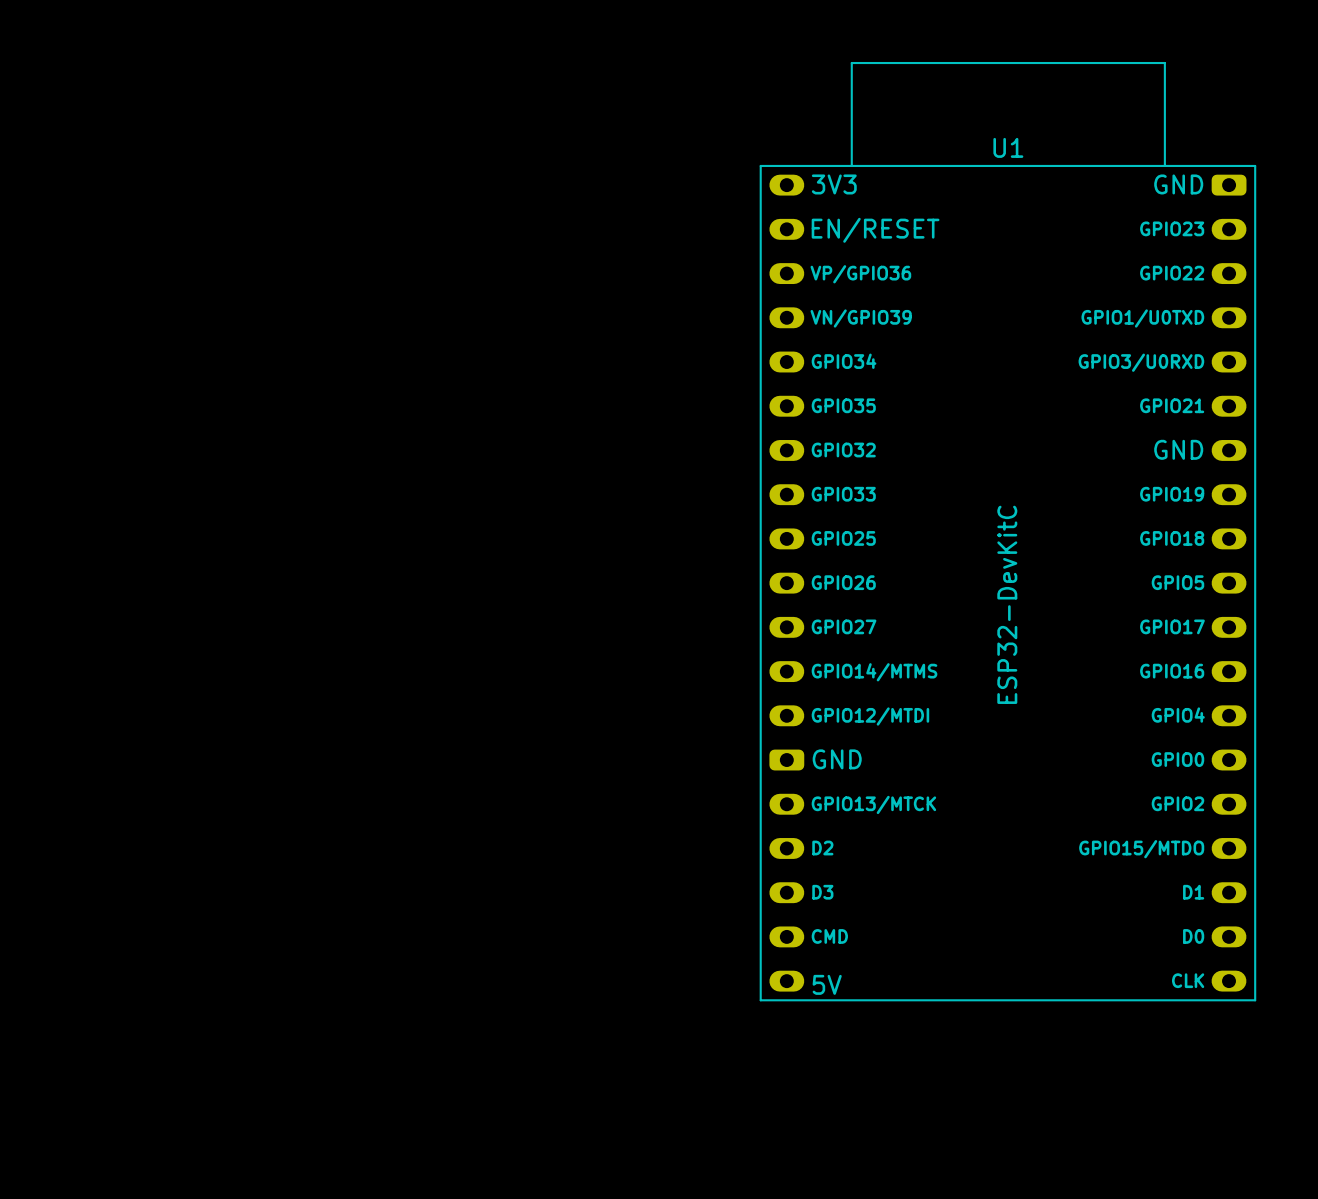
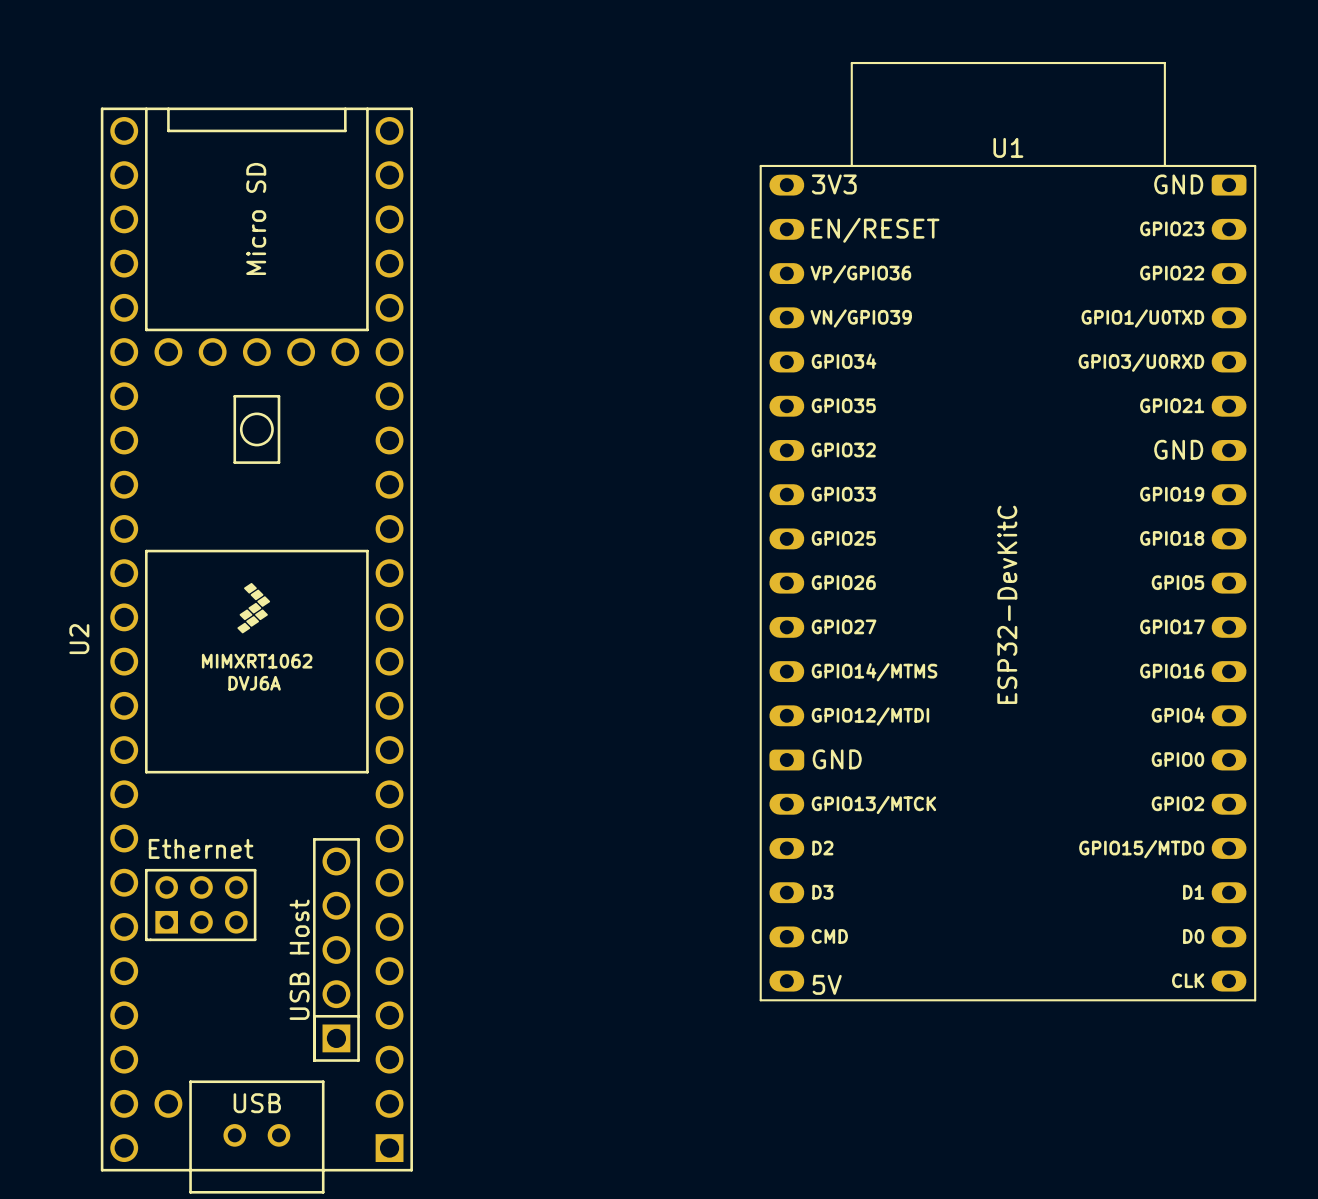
U2: none -> (256, 650)

